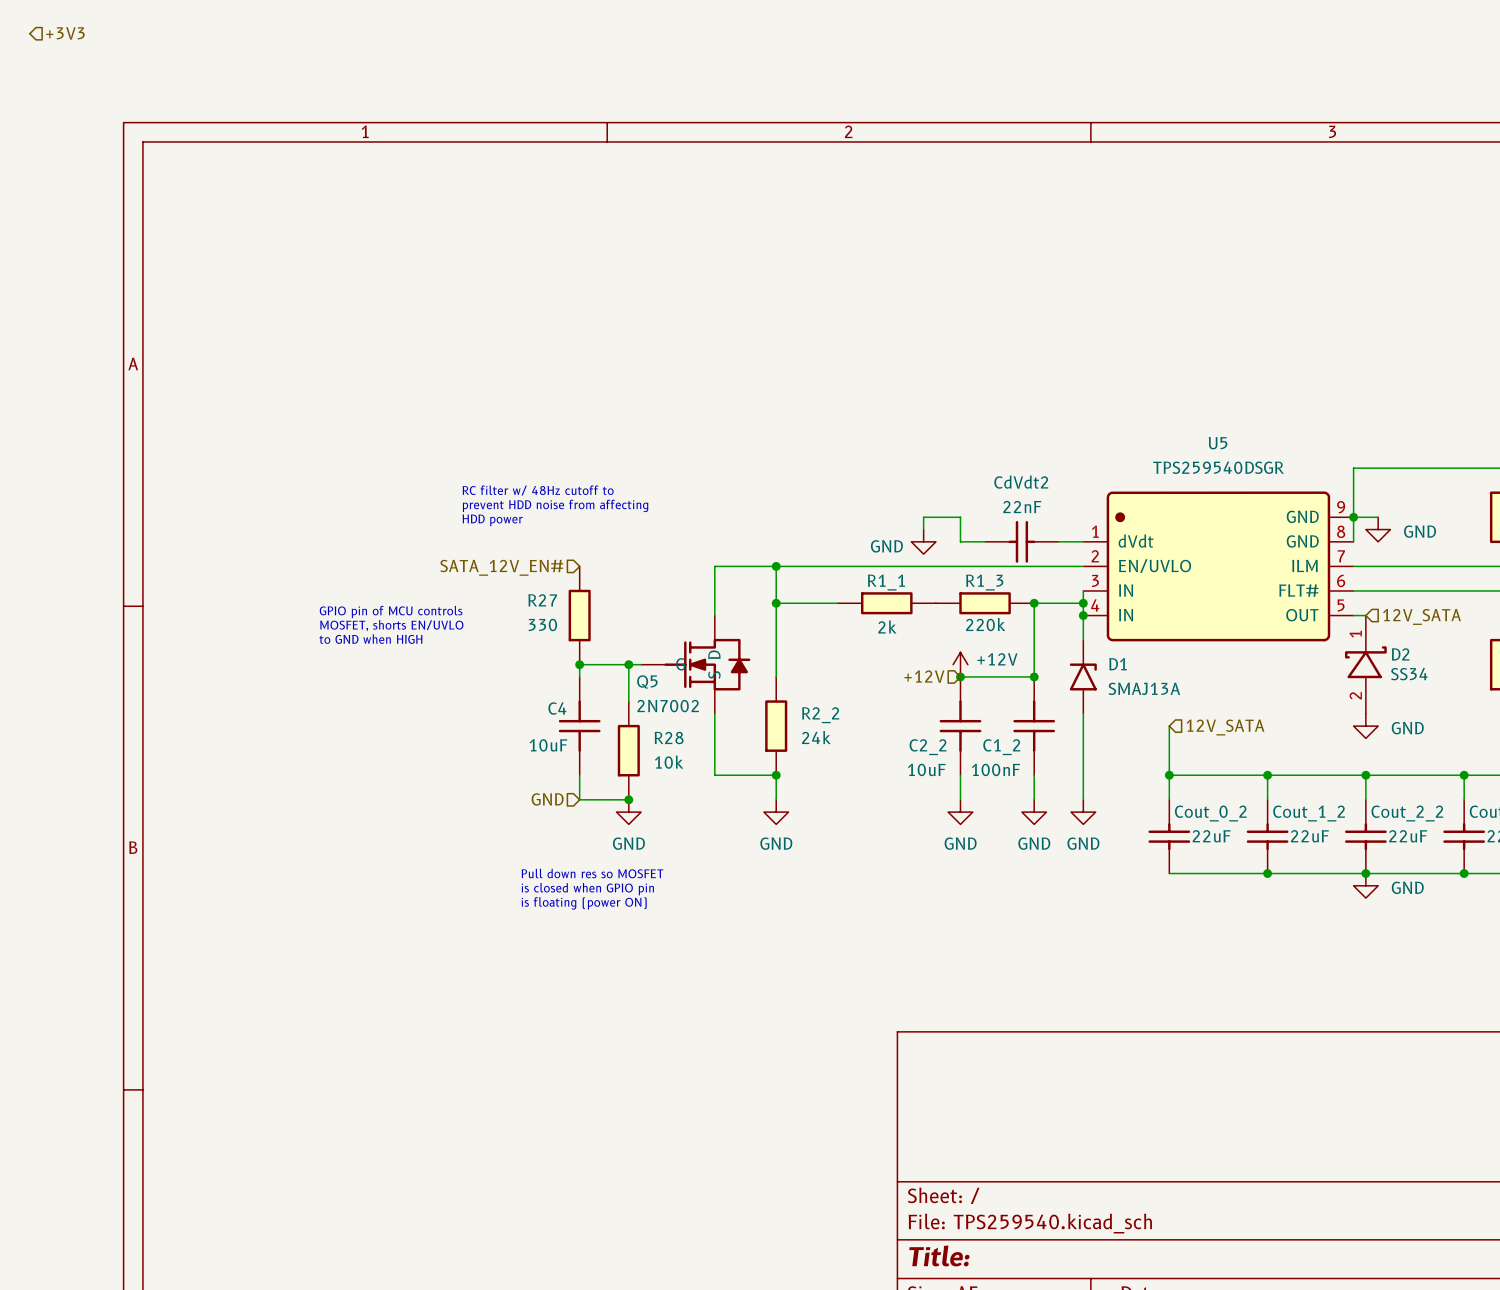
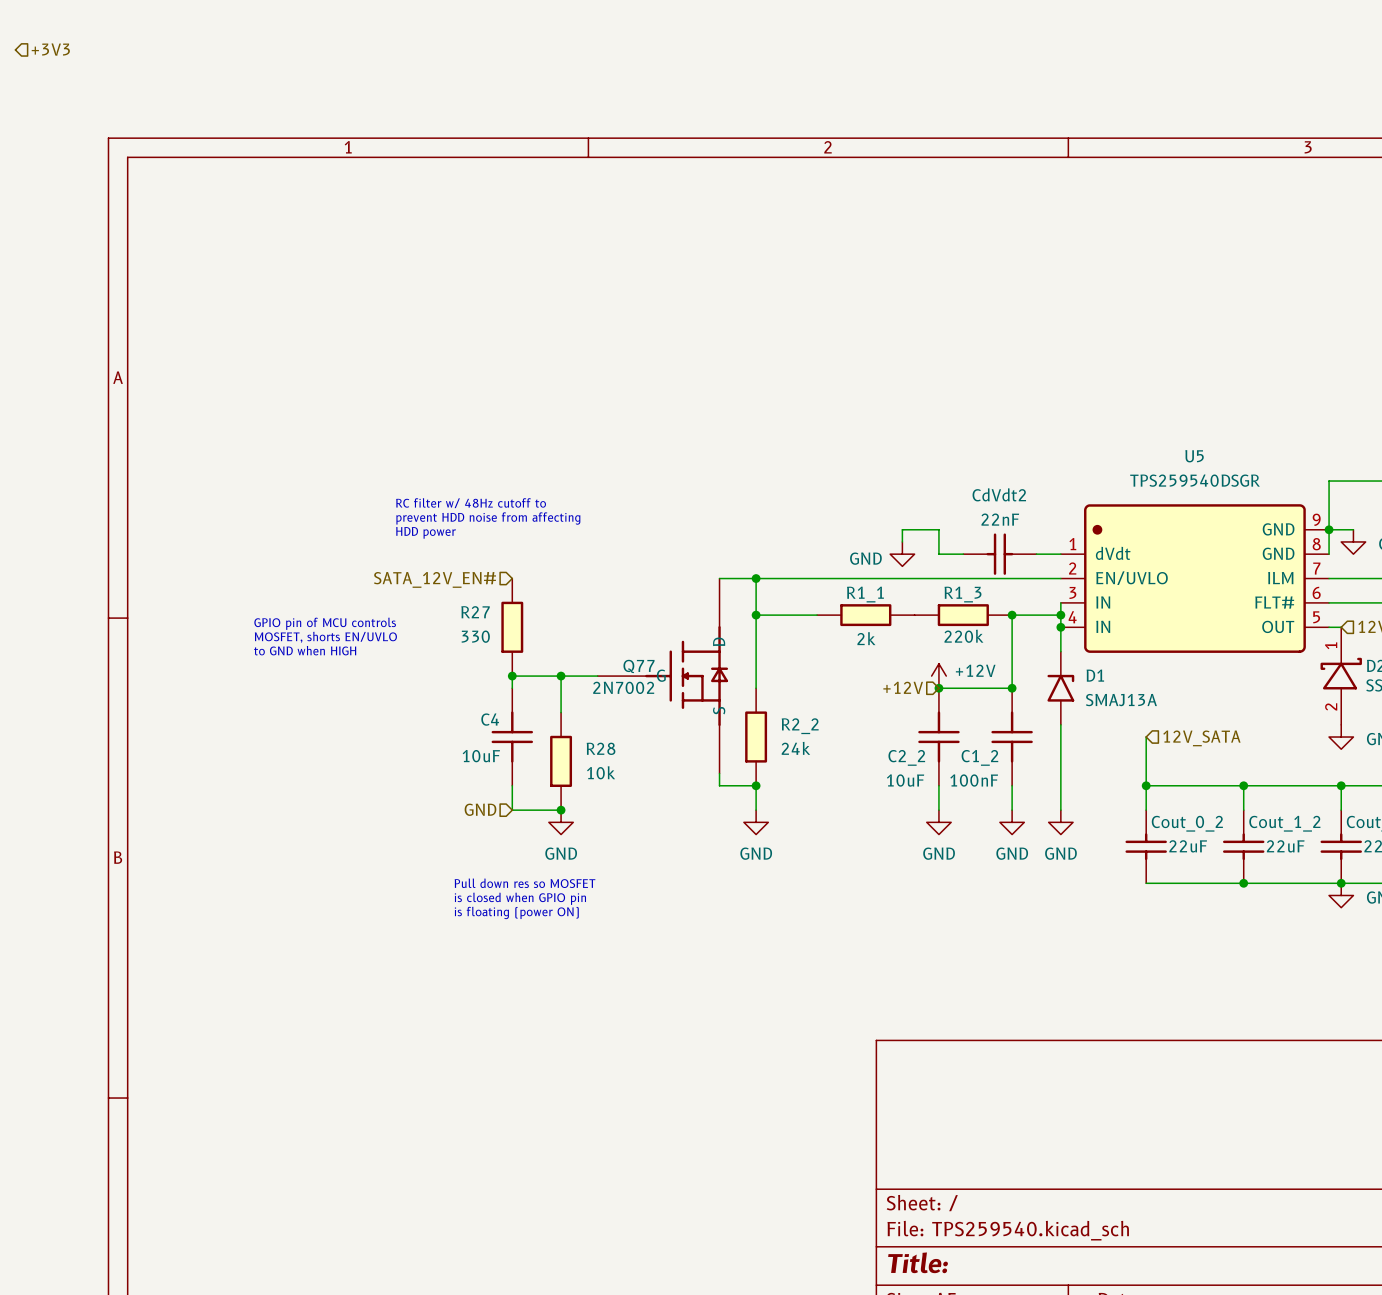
text position: RC filter w/ 48Hz cutoff to (538, 490) -> RC filter w/ 48Hz cutoff to (471, 503)
text position: prevent HDD noise from affecting (555, 505) -> prevent HDD noise from affecting (488, 518)
text position: HDD power (492, 520) -> HDD power (426, 532)
wire: (739, 566) (714, 566) (714, 615) -> none
hierarchical label position: SATA_12V_EN# (501, 567) -> SATA_12V_EN# (434, 579)
text position: GPIO pin of MCU controls (391, 612) -> GPIO pin of MCU controls (325, 623)
R27 position: (579, 615) -> (512, 627)
text position: MOSFET, shorts EN/UVLO (391, 625) -> MOSFET, shorts EN/UVLO (325, 637)
text position: to GND when HIGH (370, 639) -> to GND when HIGH (305, 650)
junction: none -> (512, 676)
wire: none -> (561, 676) (512, 676) (512, 688)
wire: (628, 664) (628, 701) -> none
junction: (628, 664) -> none
Q77: none -> 2N7002 (662, 676)
Q5: 2N7002 (695, 664) -> none
wire: (714, 713) (714, 775) (739, 775) -> (719, 773) (719, 785)
C4 position: (579, 726) -> (512, 737)
R28 position: (628, 750) -> (561, 761)
wire: (579, 775) (579, 799) (628, 799) -> (512, 785) (512, 810) (561, 810)
hierarchical label position: GND (547, 799) -> GND (480, 809)
junction position: (628, 799) -> (561, 810)
power symbol position: GND (628, 812) -> GND (561, 822)
text position: Pull down res so MOSFET (592, 873) -> Pull down res so MOSFET (525, 883)
text position: is closed when GPIO pin (587, 889) -> is closed when GPIO pin (520, 898)
text position: is floating (power ON) (584, 903) -> is floating (power ON) (516, 912)

